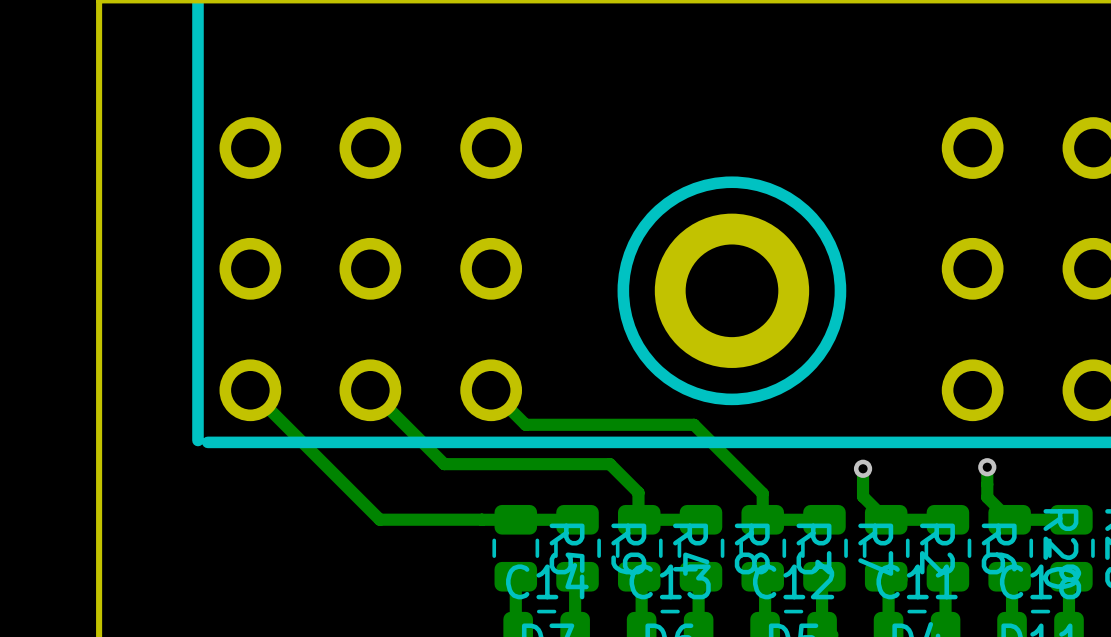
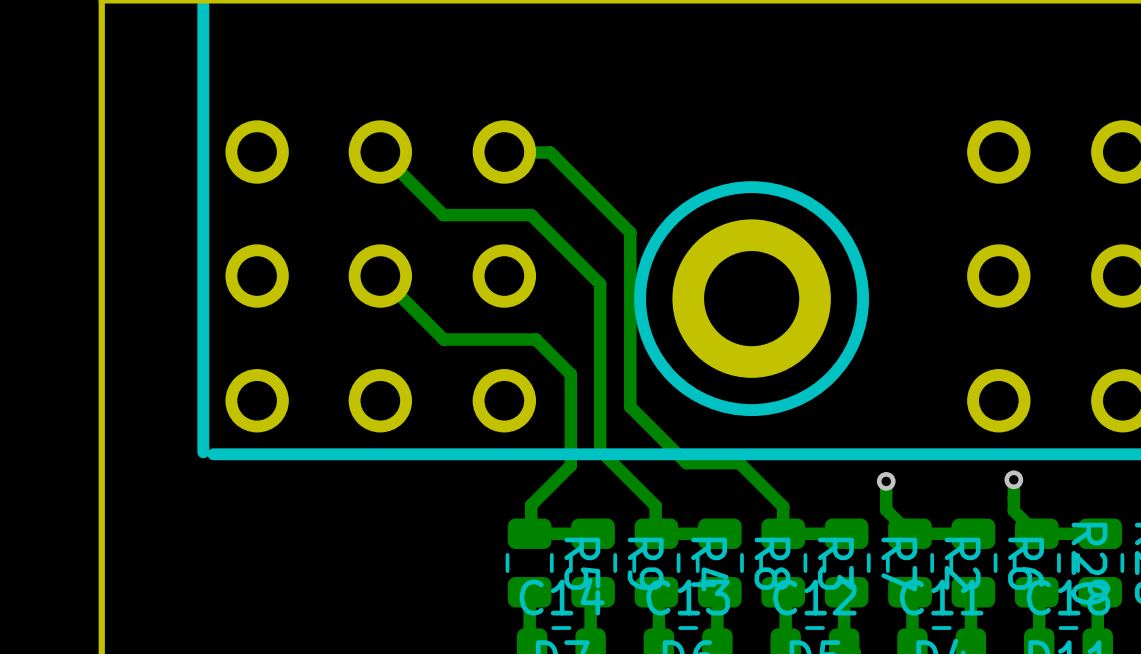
track: none -> (380, 276) (443, 339) (536, 339) (570, 374) (570, 465) (531, 505) (531, 532)
track: (250, 390) (379, 519) (515, 519) -> none
track: (370, 390) (444, 464) (609, 464) -> (380, 152) (443, 215) (531, 215) (600, 284) (600, 450) (626, 476)
track: (491, 390) (525, 424) (694, 424) (720, 451) -> (504, 152) (550, 152) (630, 232) (630, 406) (686, 463) (739, 463)

